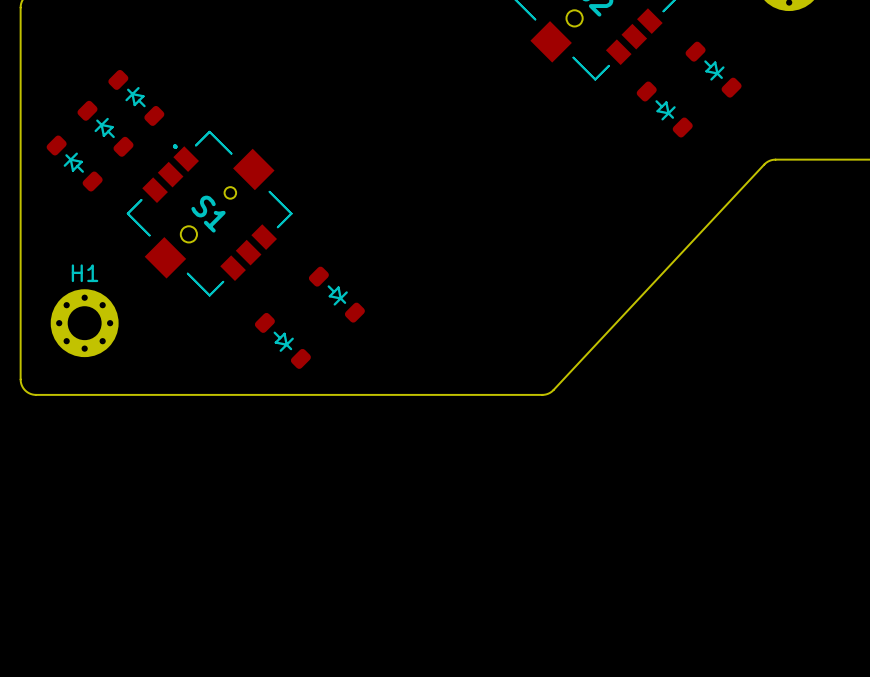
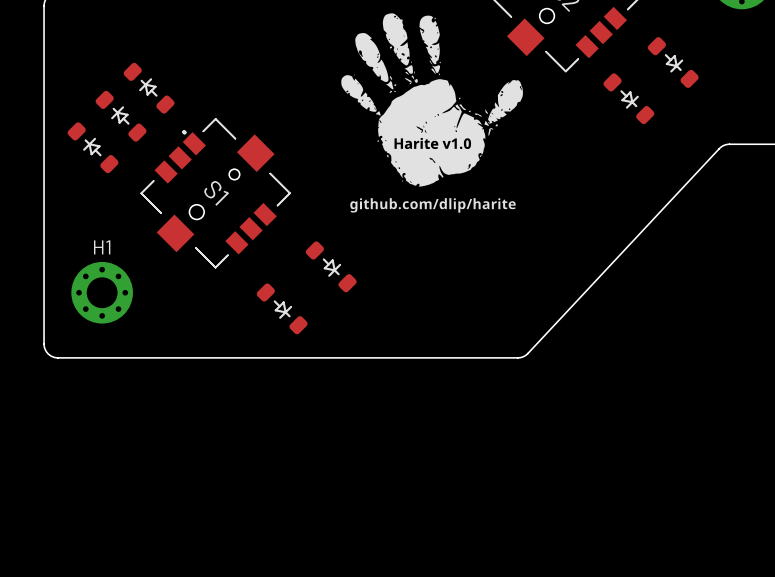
drawing: none -> [341, 13, 523, 213]

